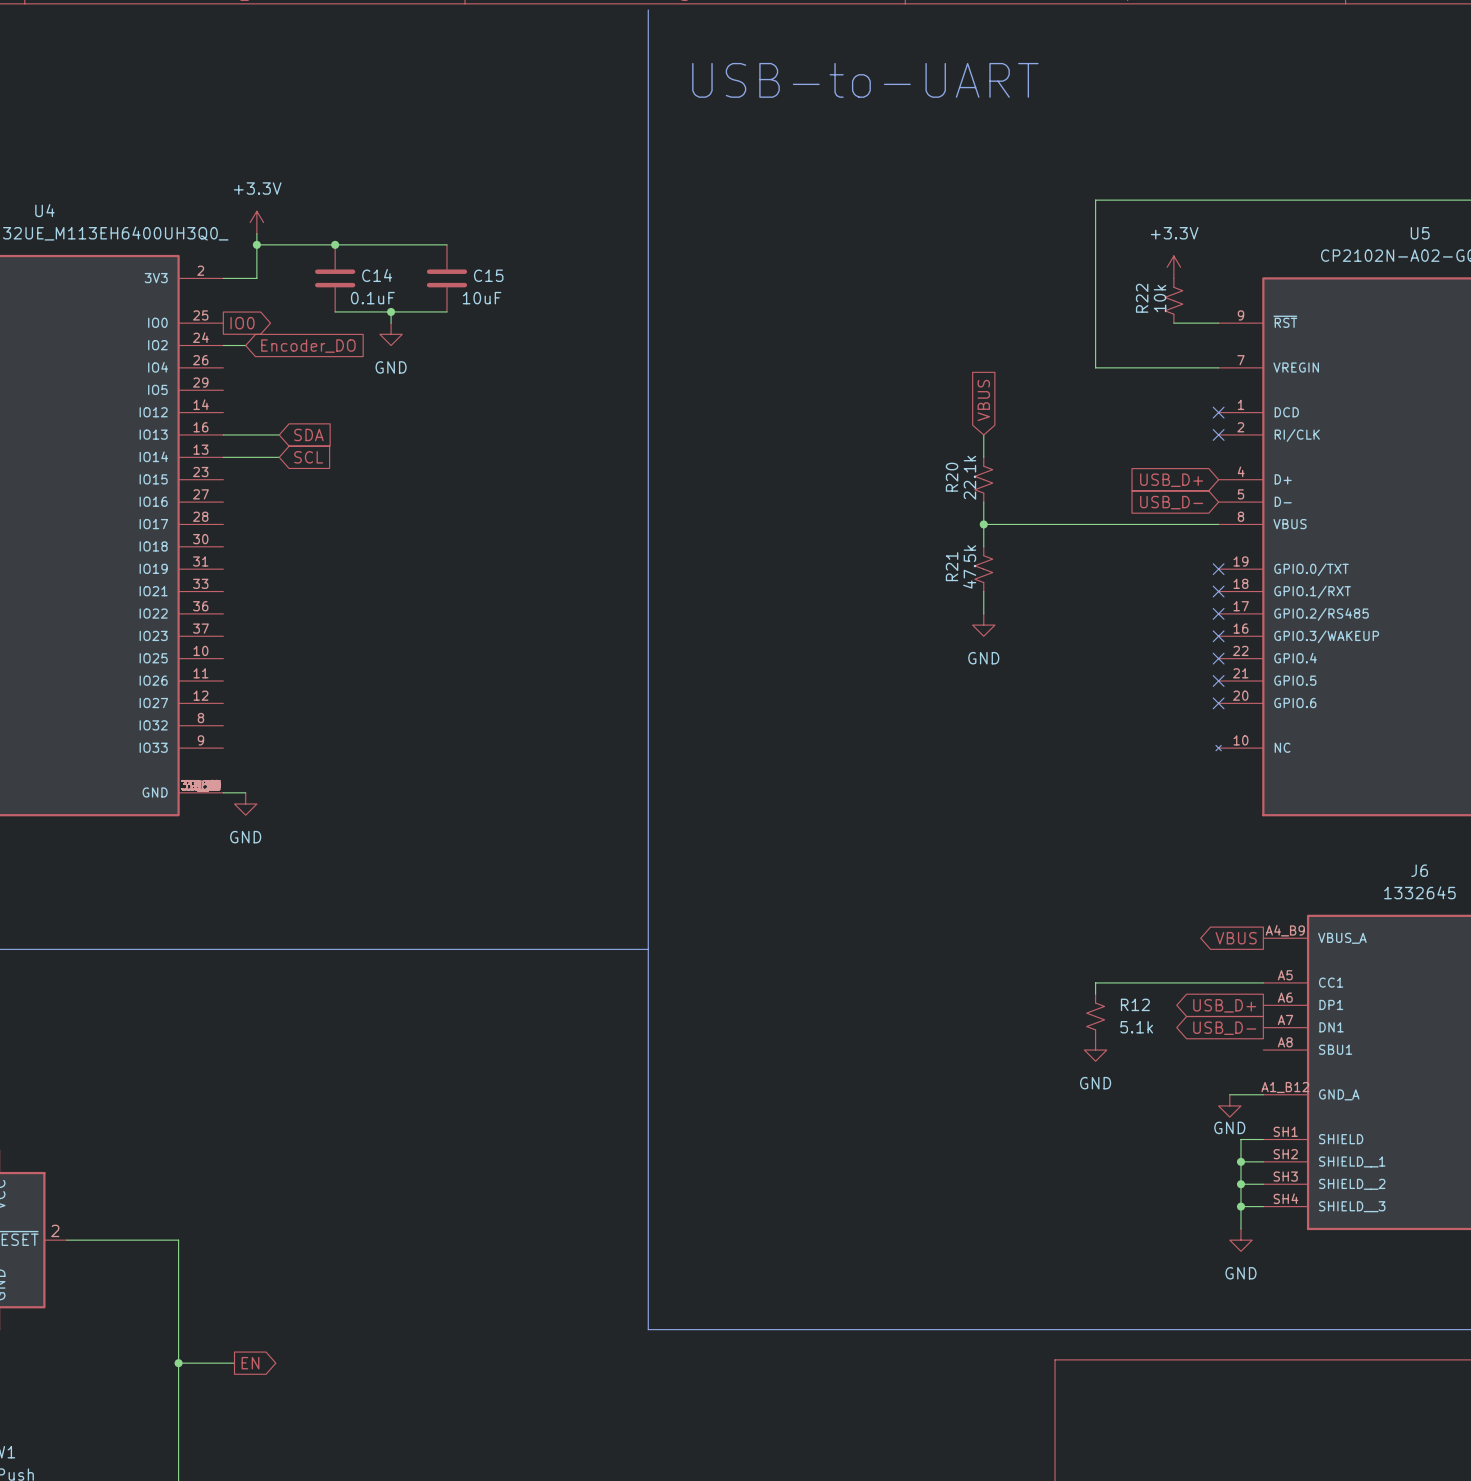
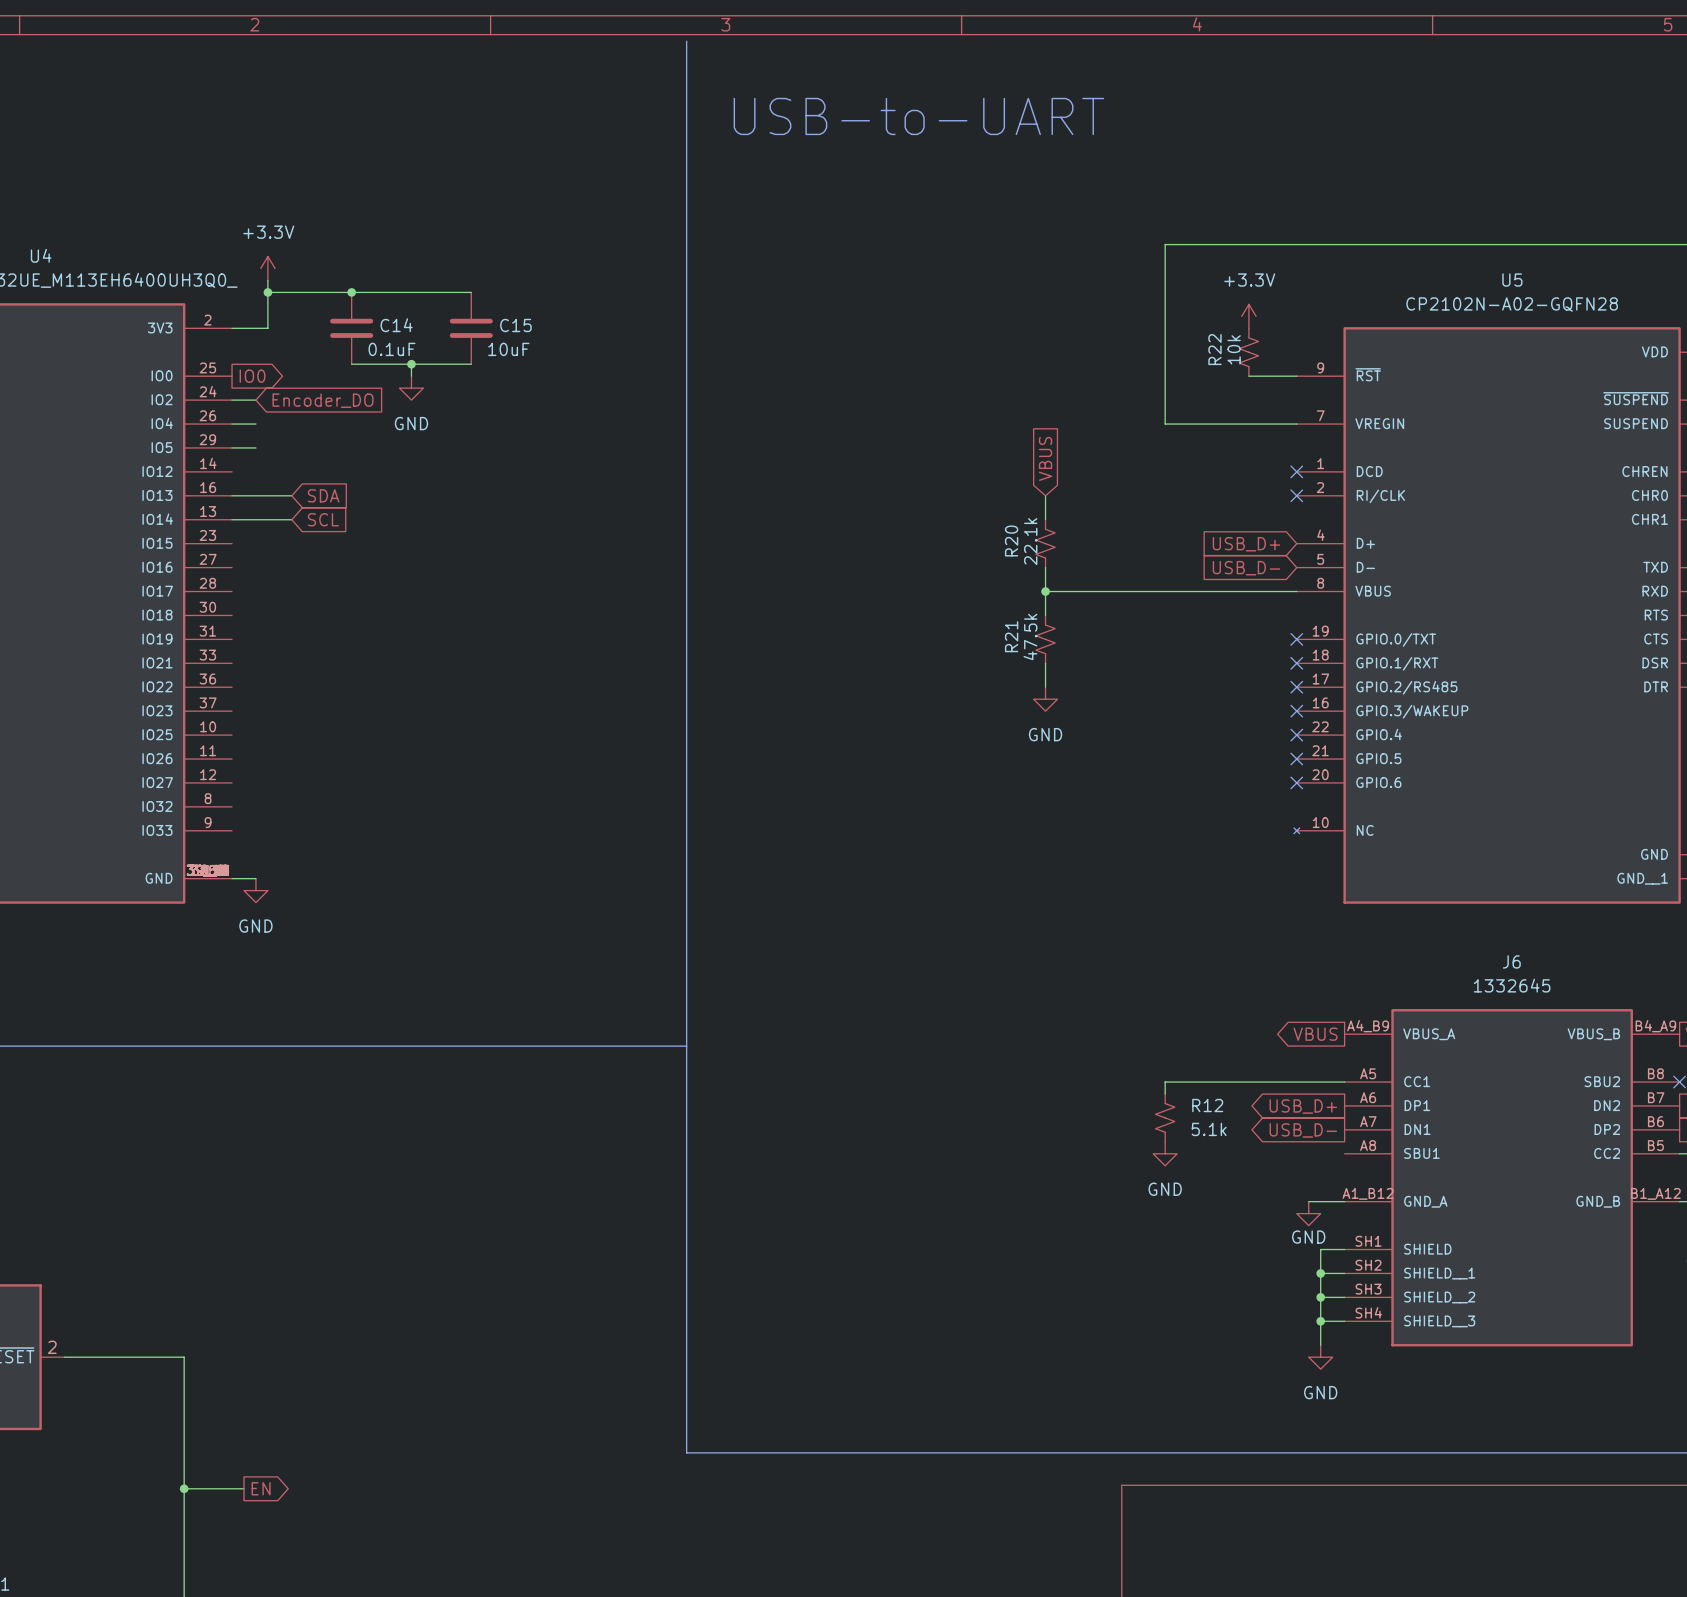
wire: none -> (232, 424) (255, 424)
wire: none -> (232, 447) (255, 447)

